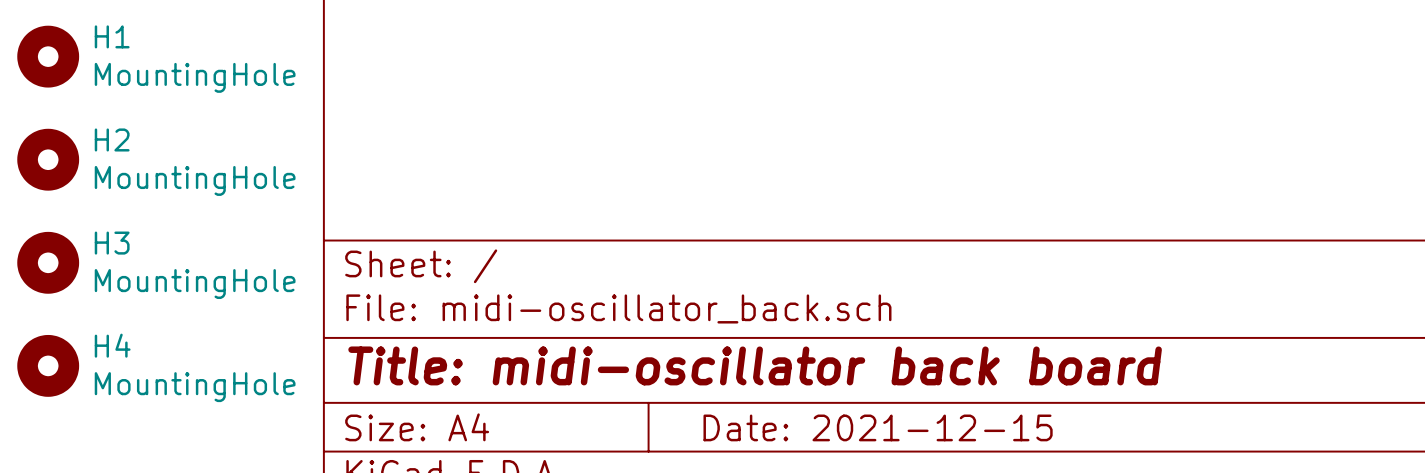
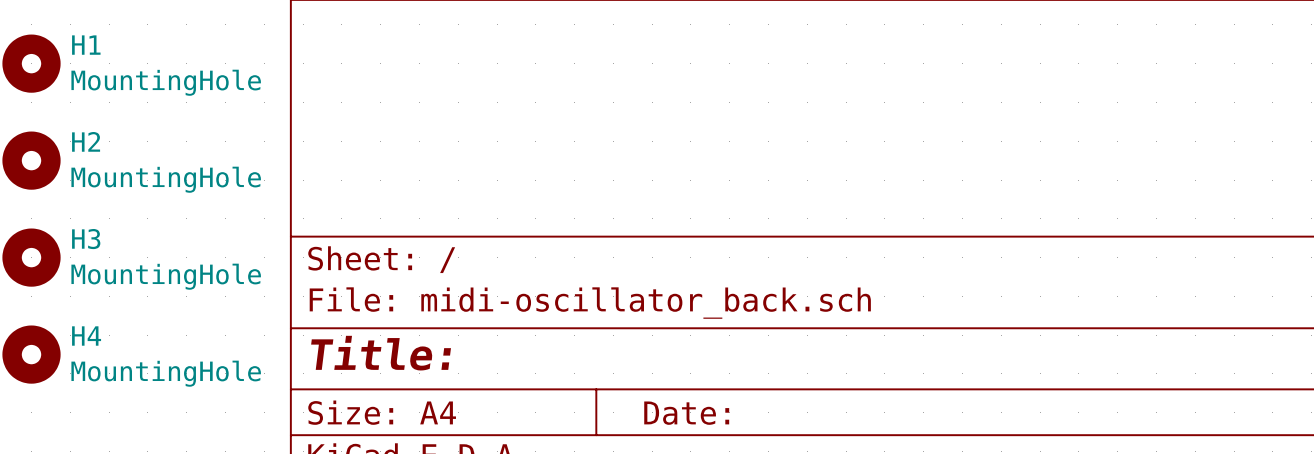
title block: Title: midi-oscillator back board (755, 365) -> Title: (381, 353)
title block: Date: 2021-12-15 (878, 427) -> Date: (686, 413)

